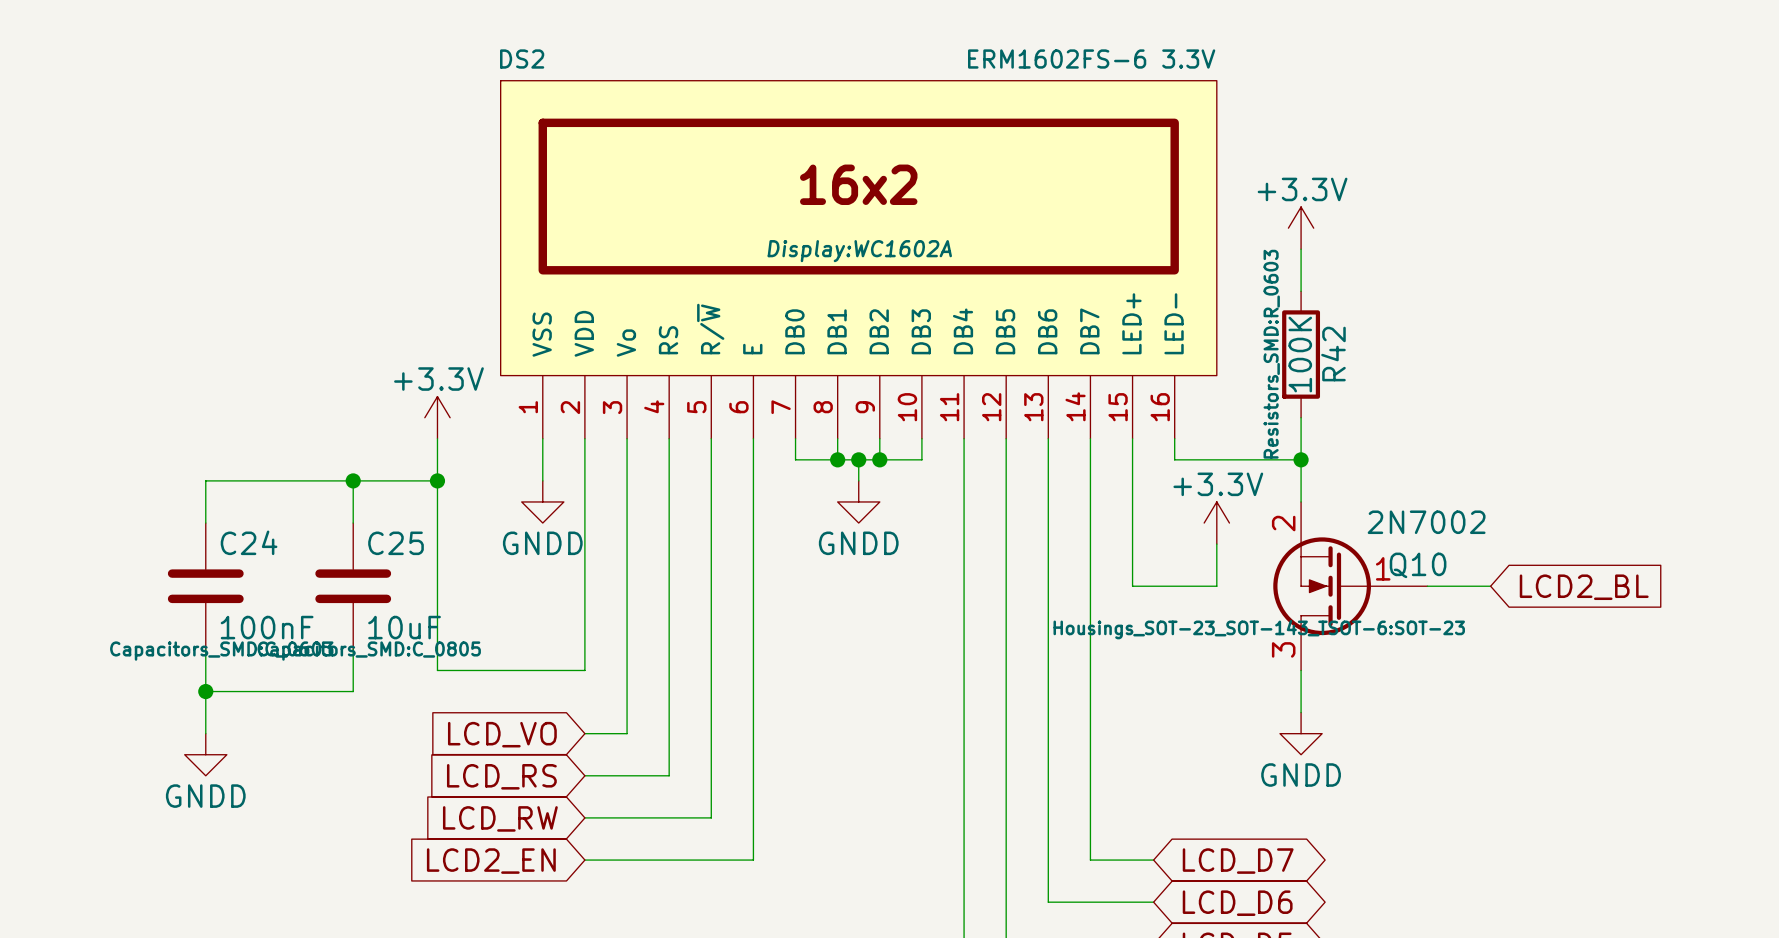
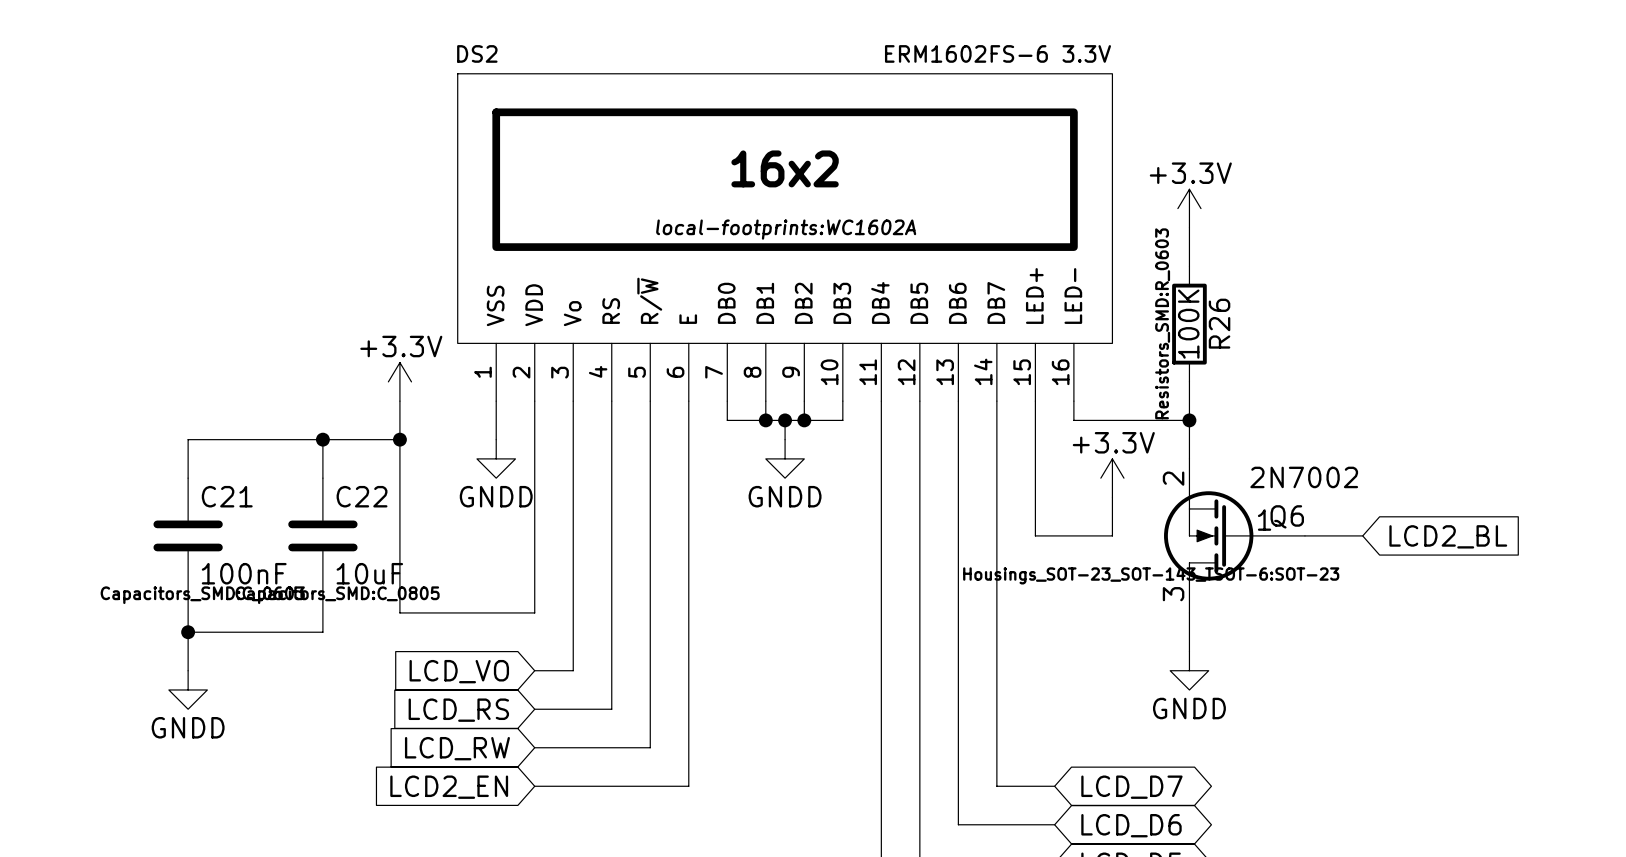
DS2 text: Display:WC1602A (859, 251) -> local-footprints:WC1602A (786, 229)
R42 name: R42 (1333, 354) -> R26 (1219, 323)
C24 name: C24 (249, 542) -> C21 (227, 496)
C25 name: C25 (396, 543) -> C22 (362, 496)
Q10 name: Q10 (1418, 565) -> Q6 (1287, 516)

